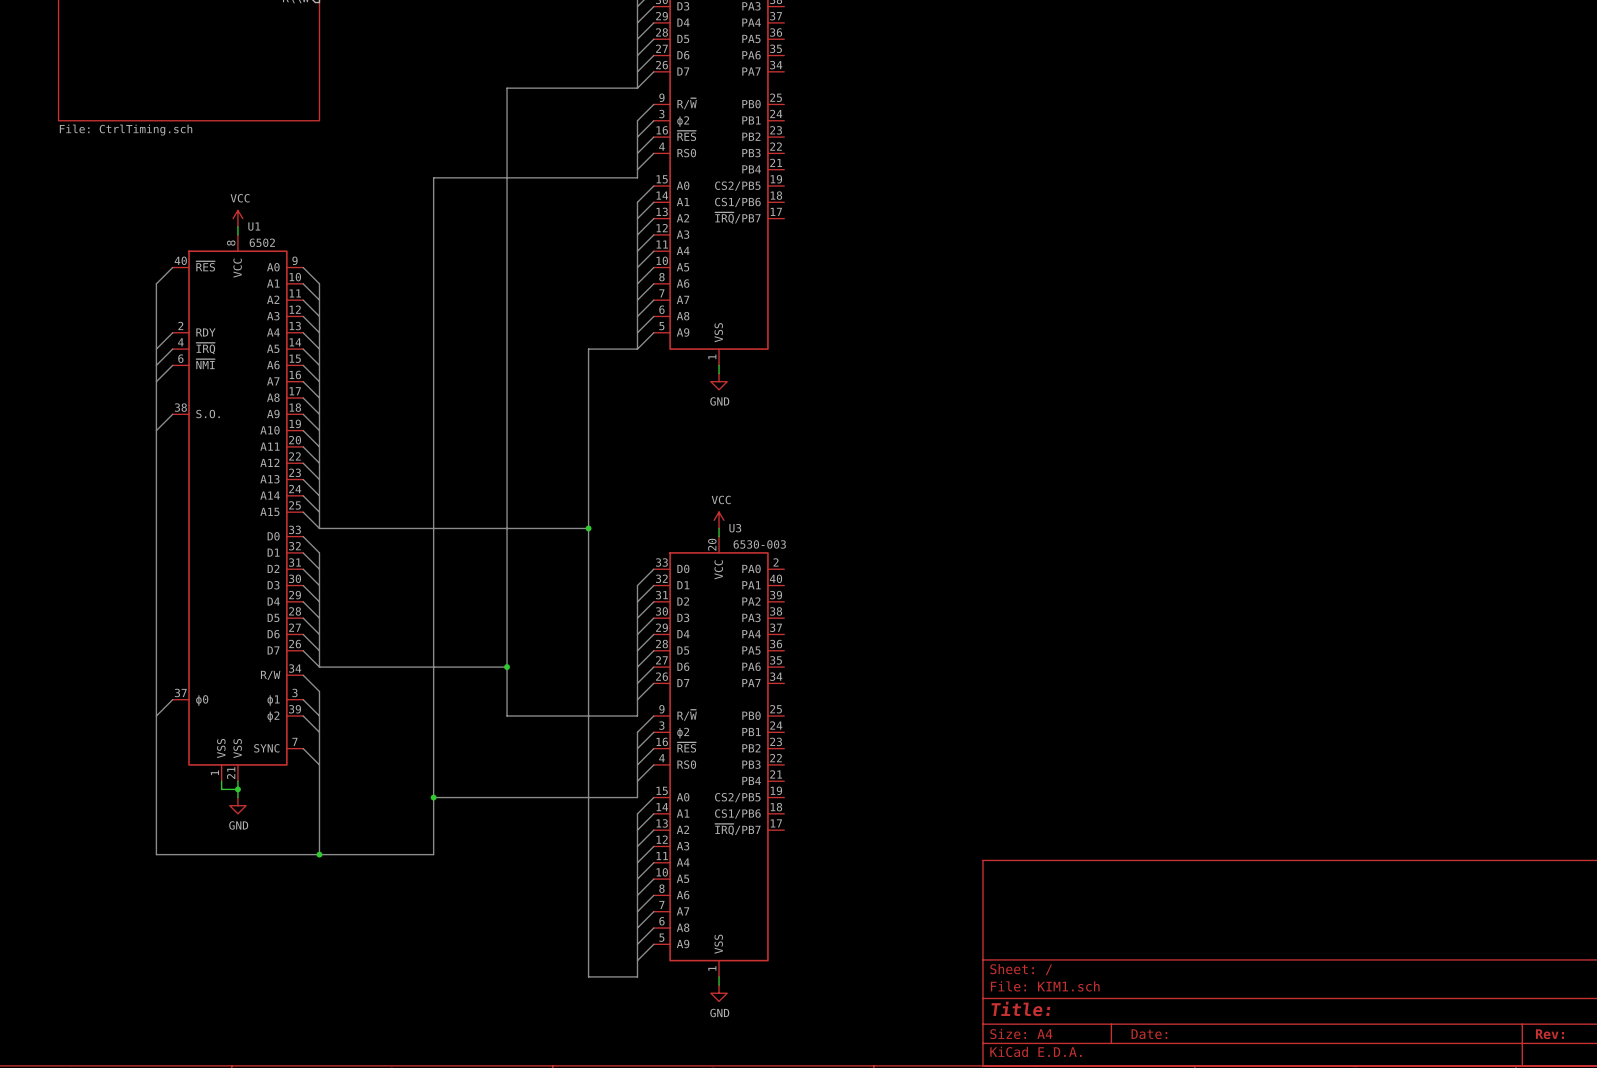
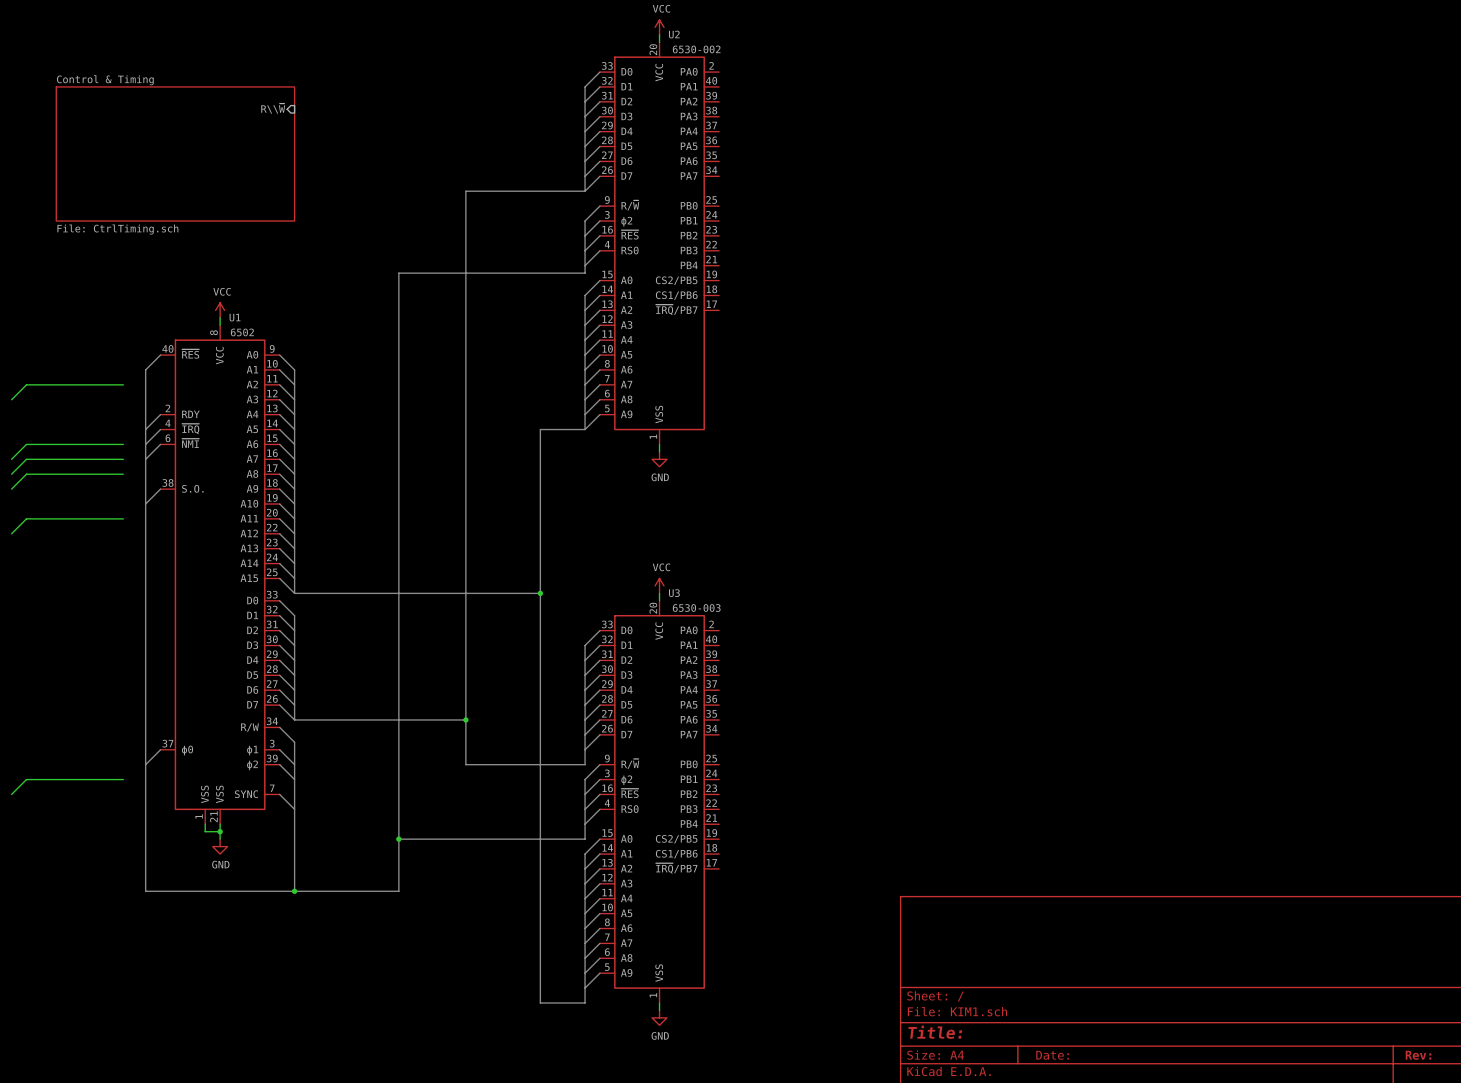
wire: none -> (123, 384) (26, 384) (11, 399)
wire: none -> (123, 444) (26, 444) (11, 459)
wire: none -> (123, 459) (26, 459) (11, 474)
wire: none -> (123, 474) (26, 474) (11, 489)
wire: none -> (123, 518) (26, 518) (11, 533)
wire: none -> (123, 779) (26, 779) (11, 794)

